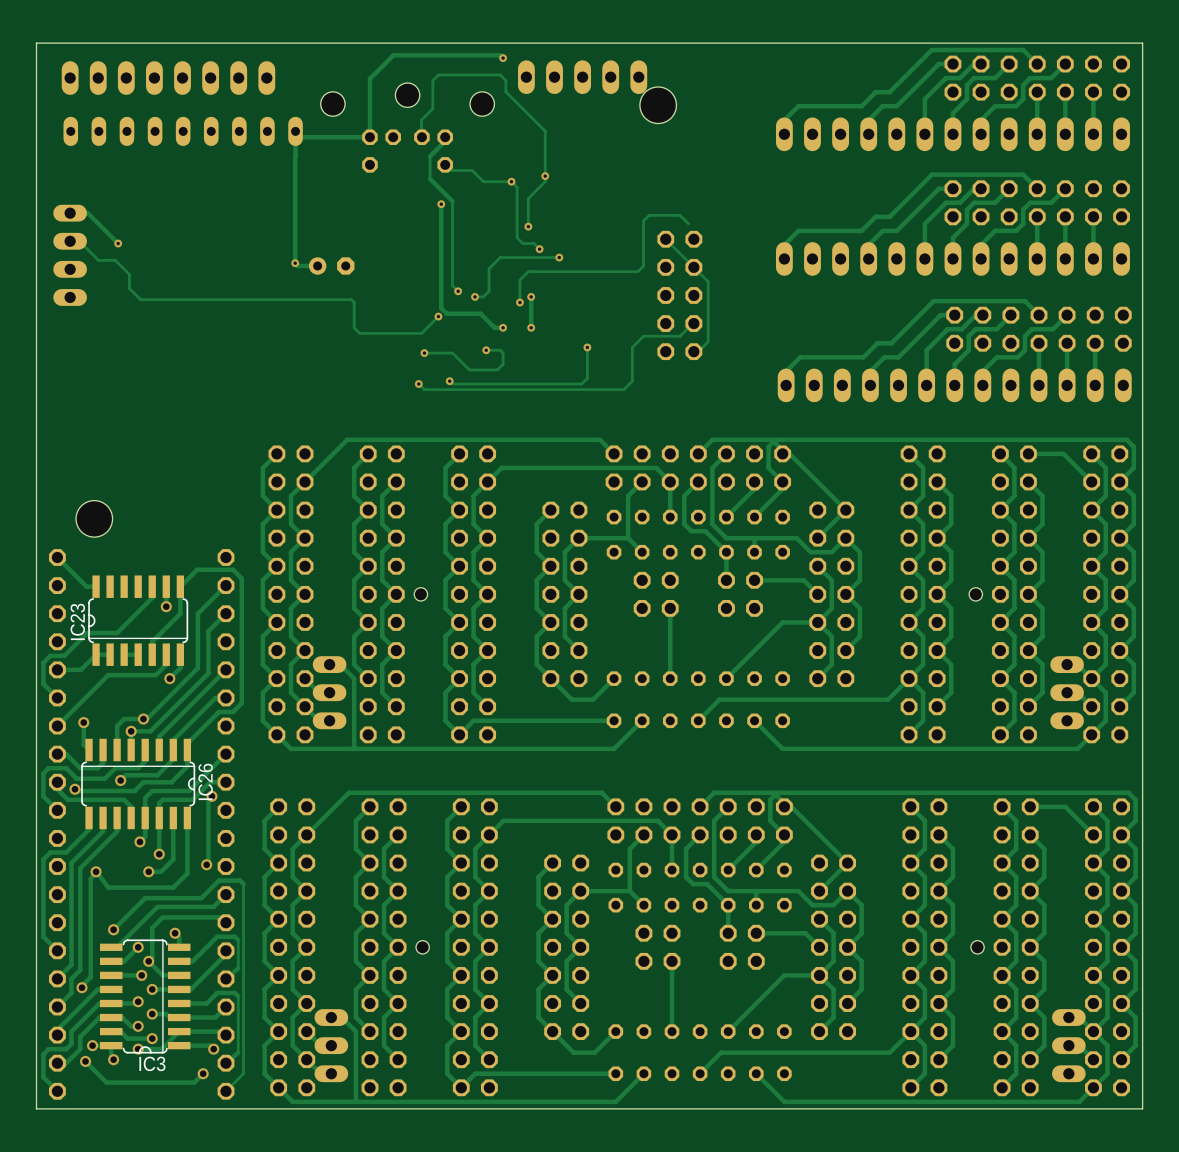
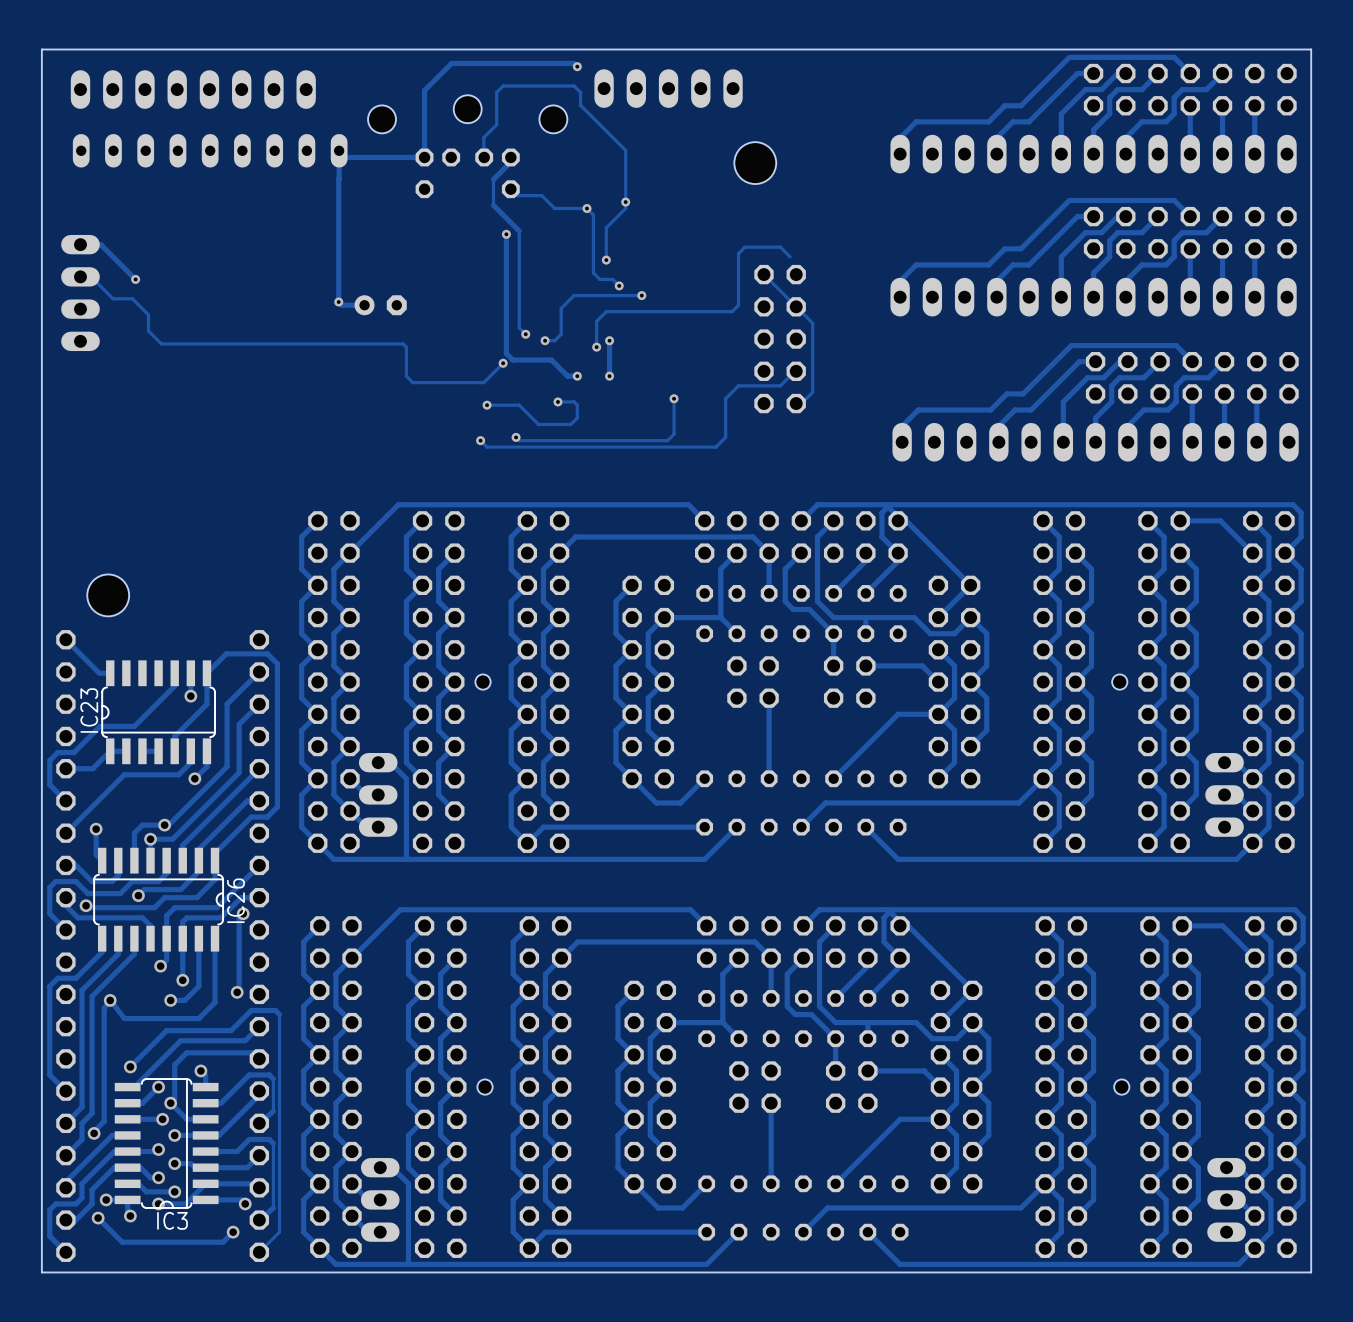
hole position: (658, 105) -> (755, 163)

